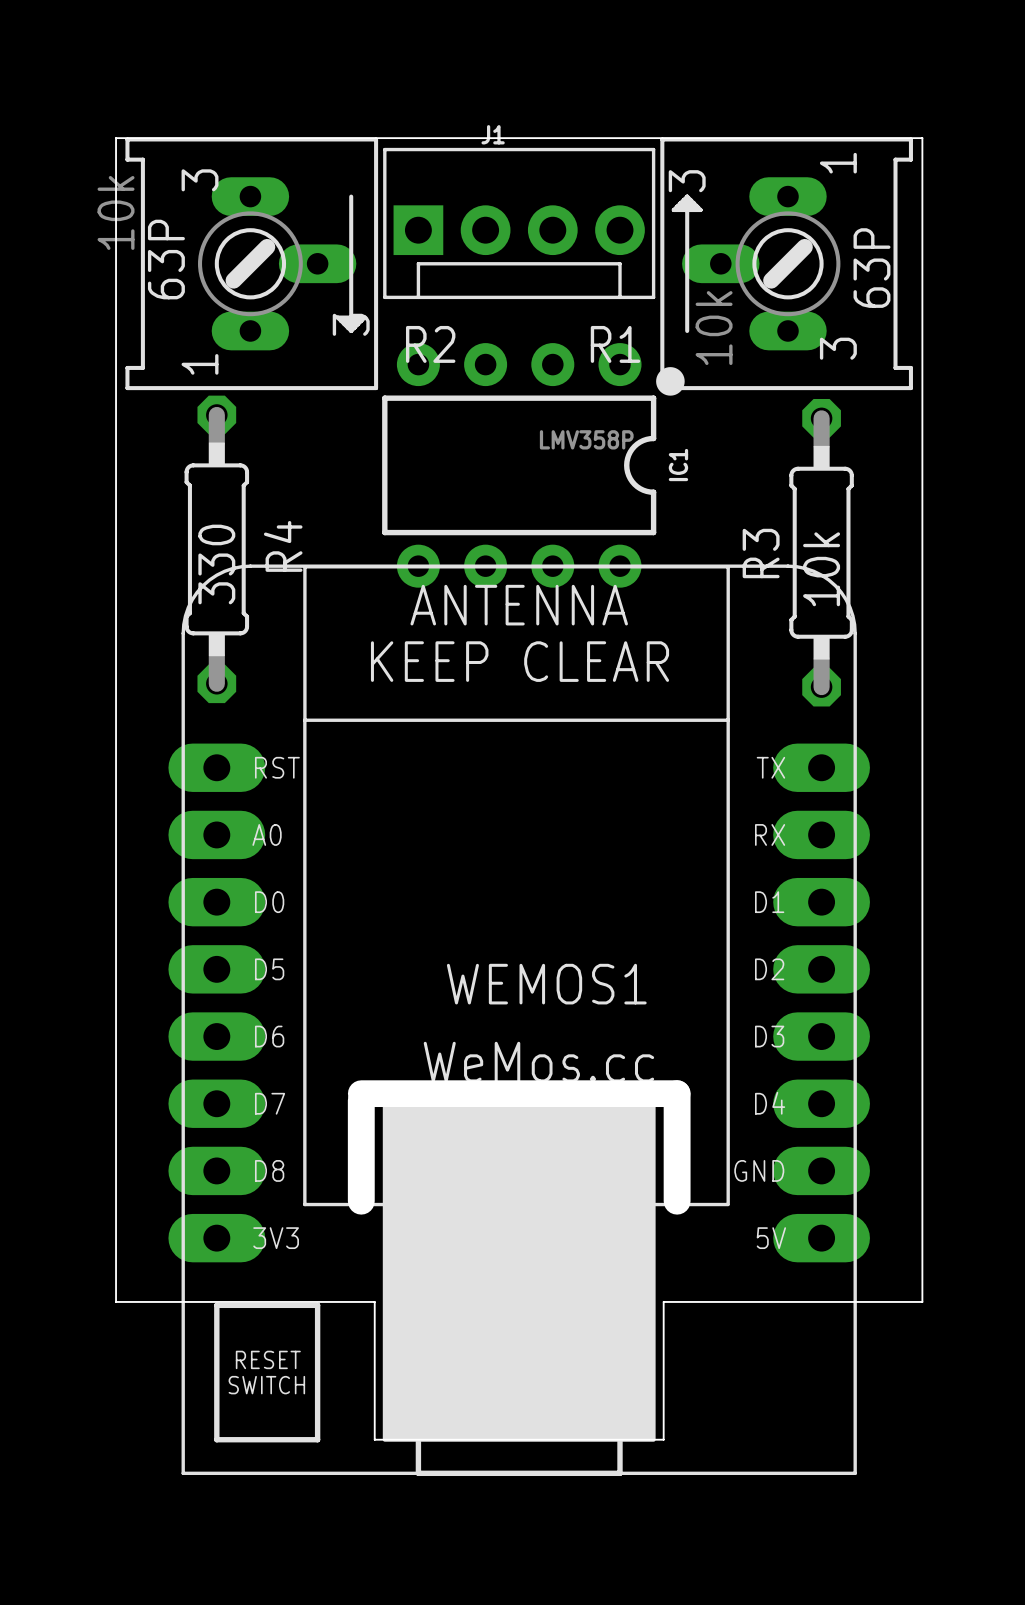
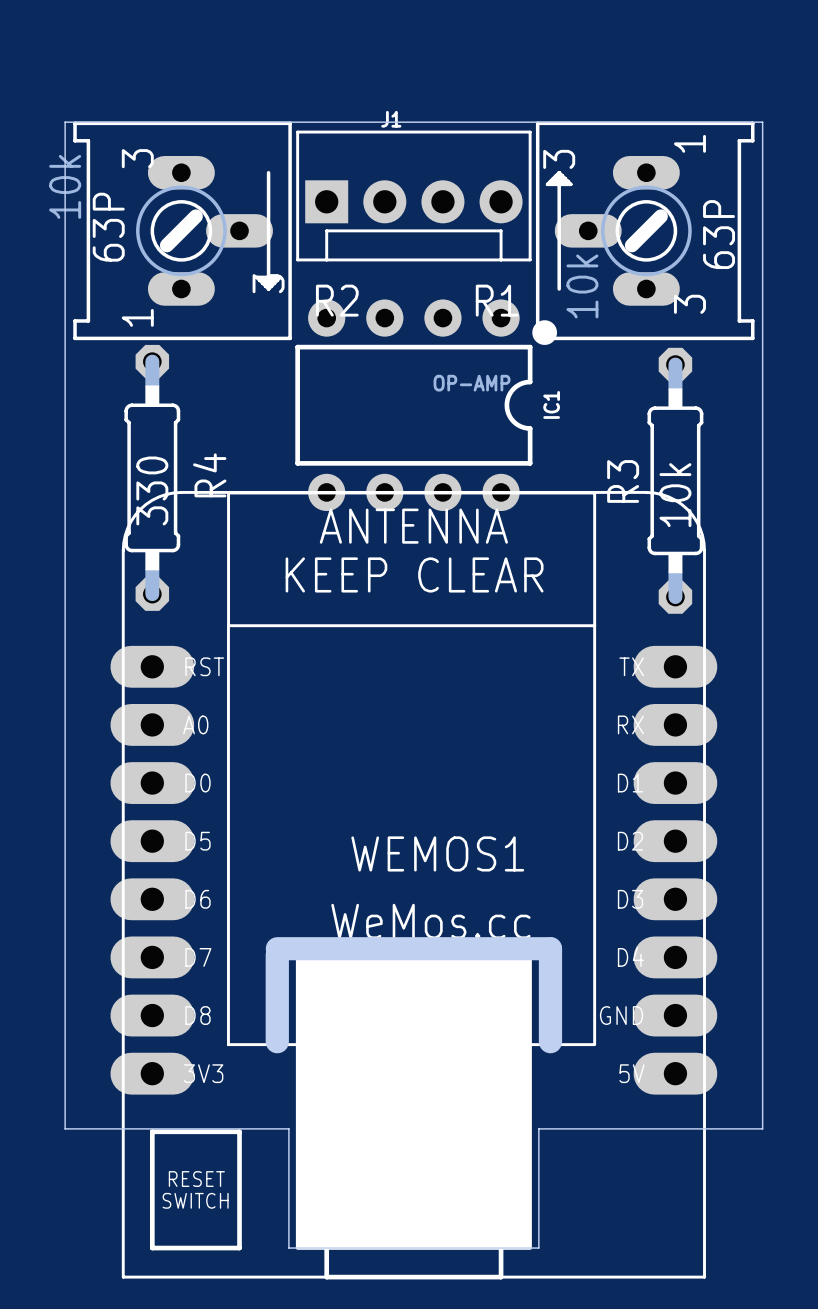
IC1 value: LMV358P (586, 439) -> OP-AMP (472, 383)

